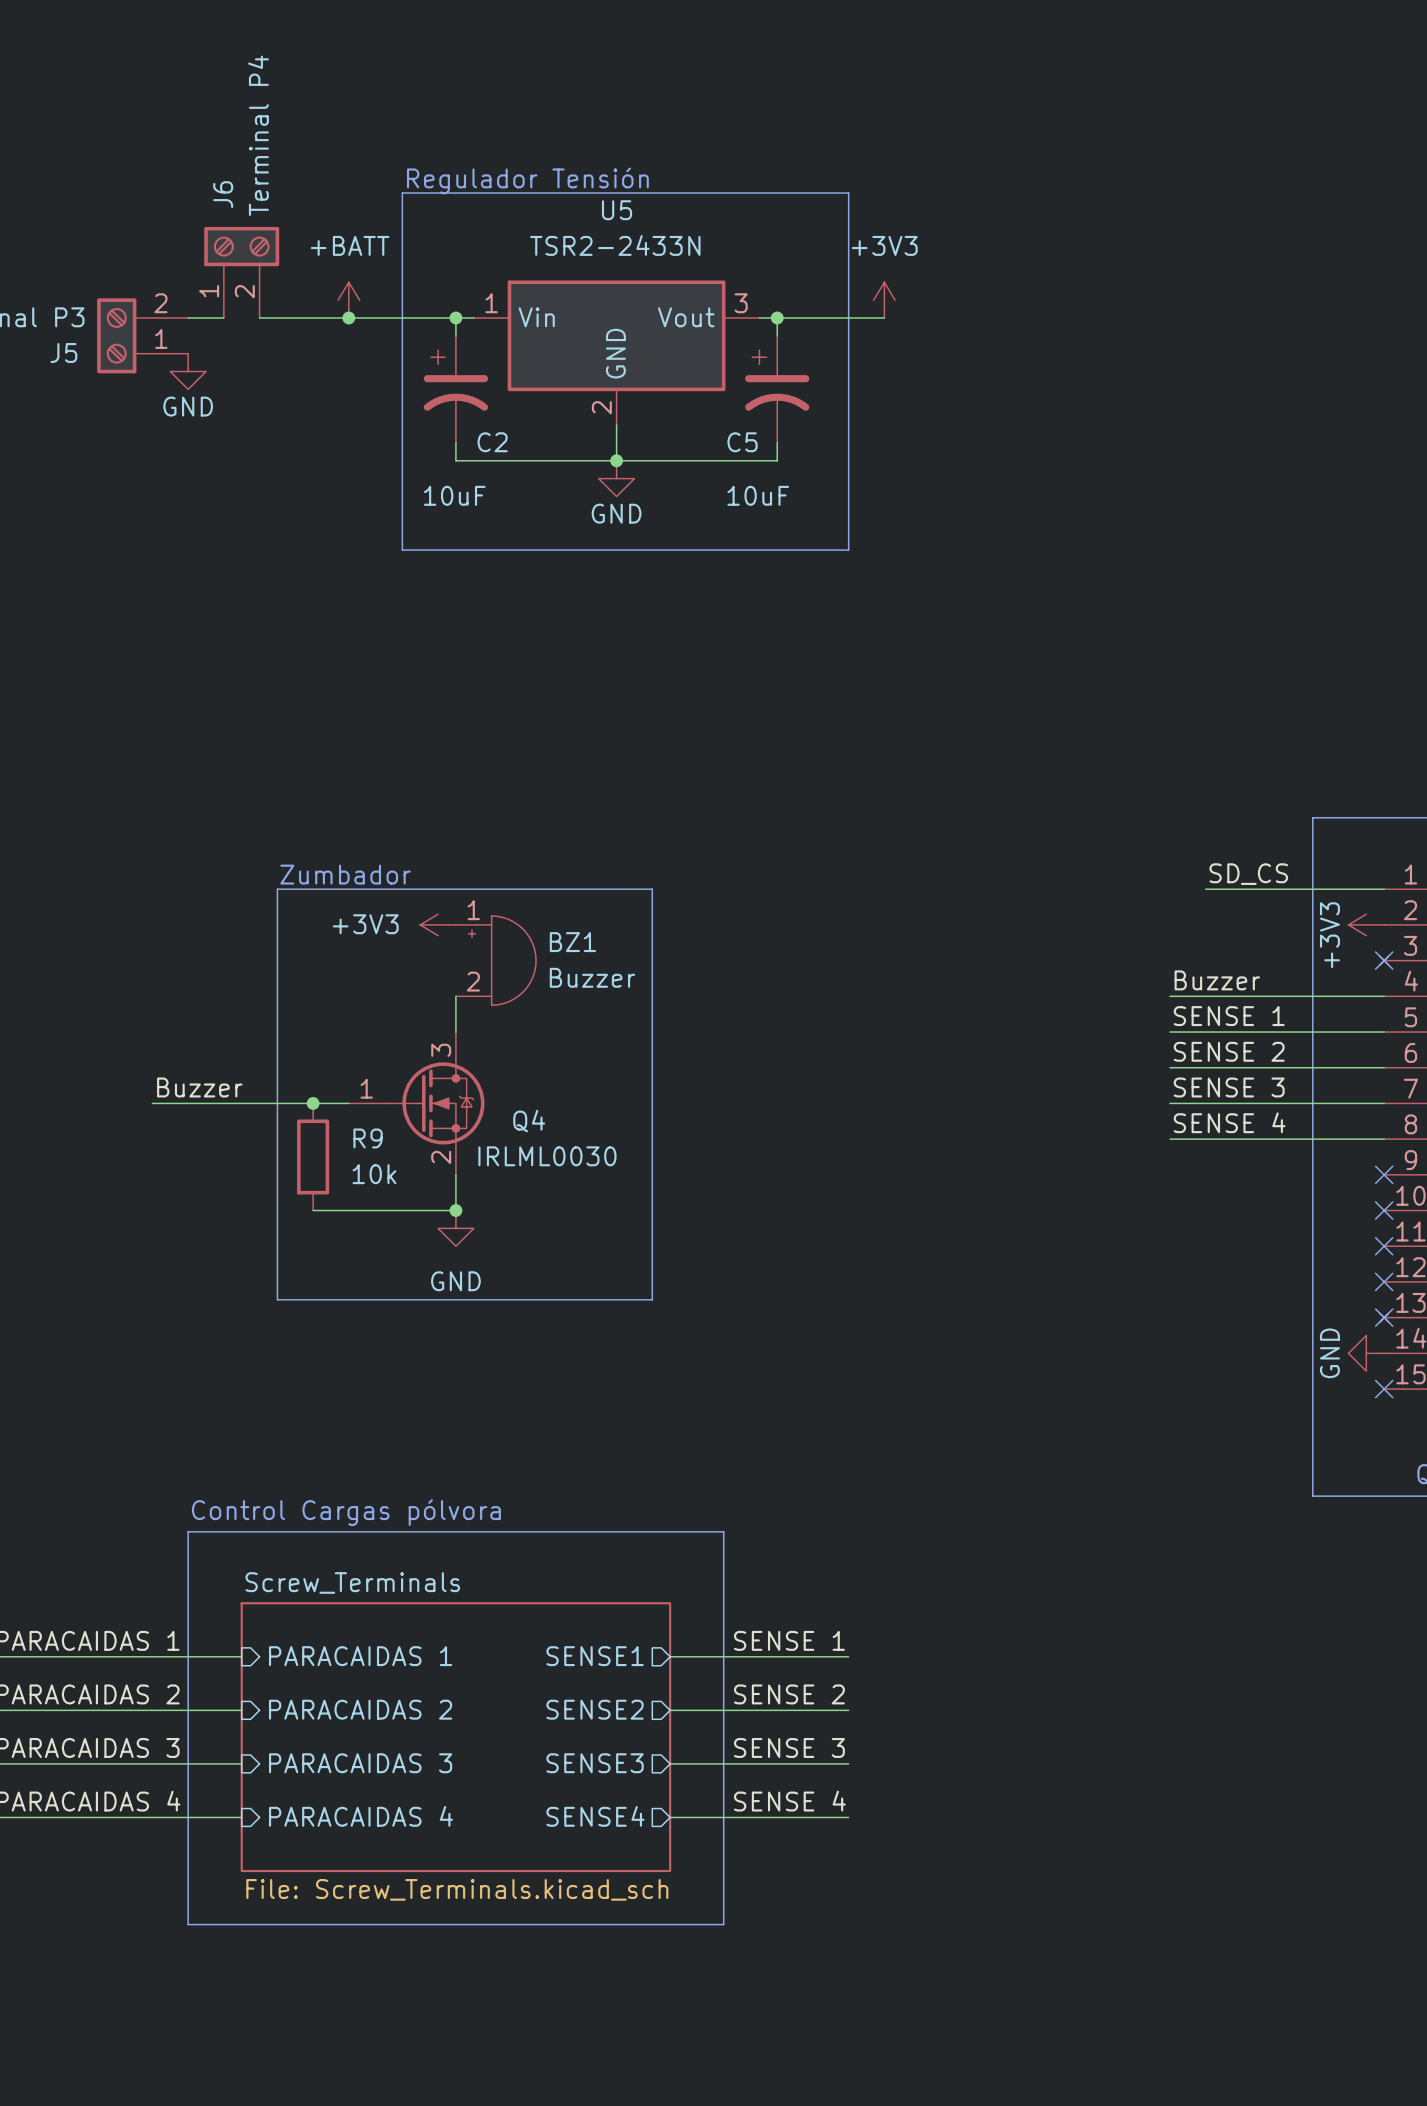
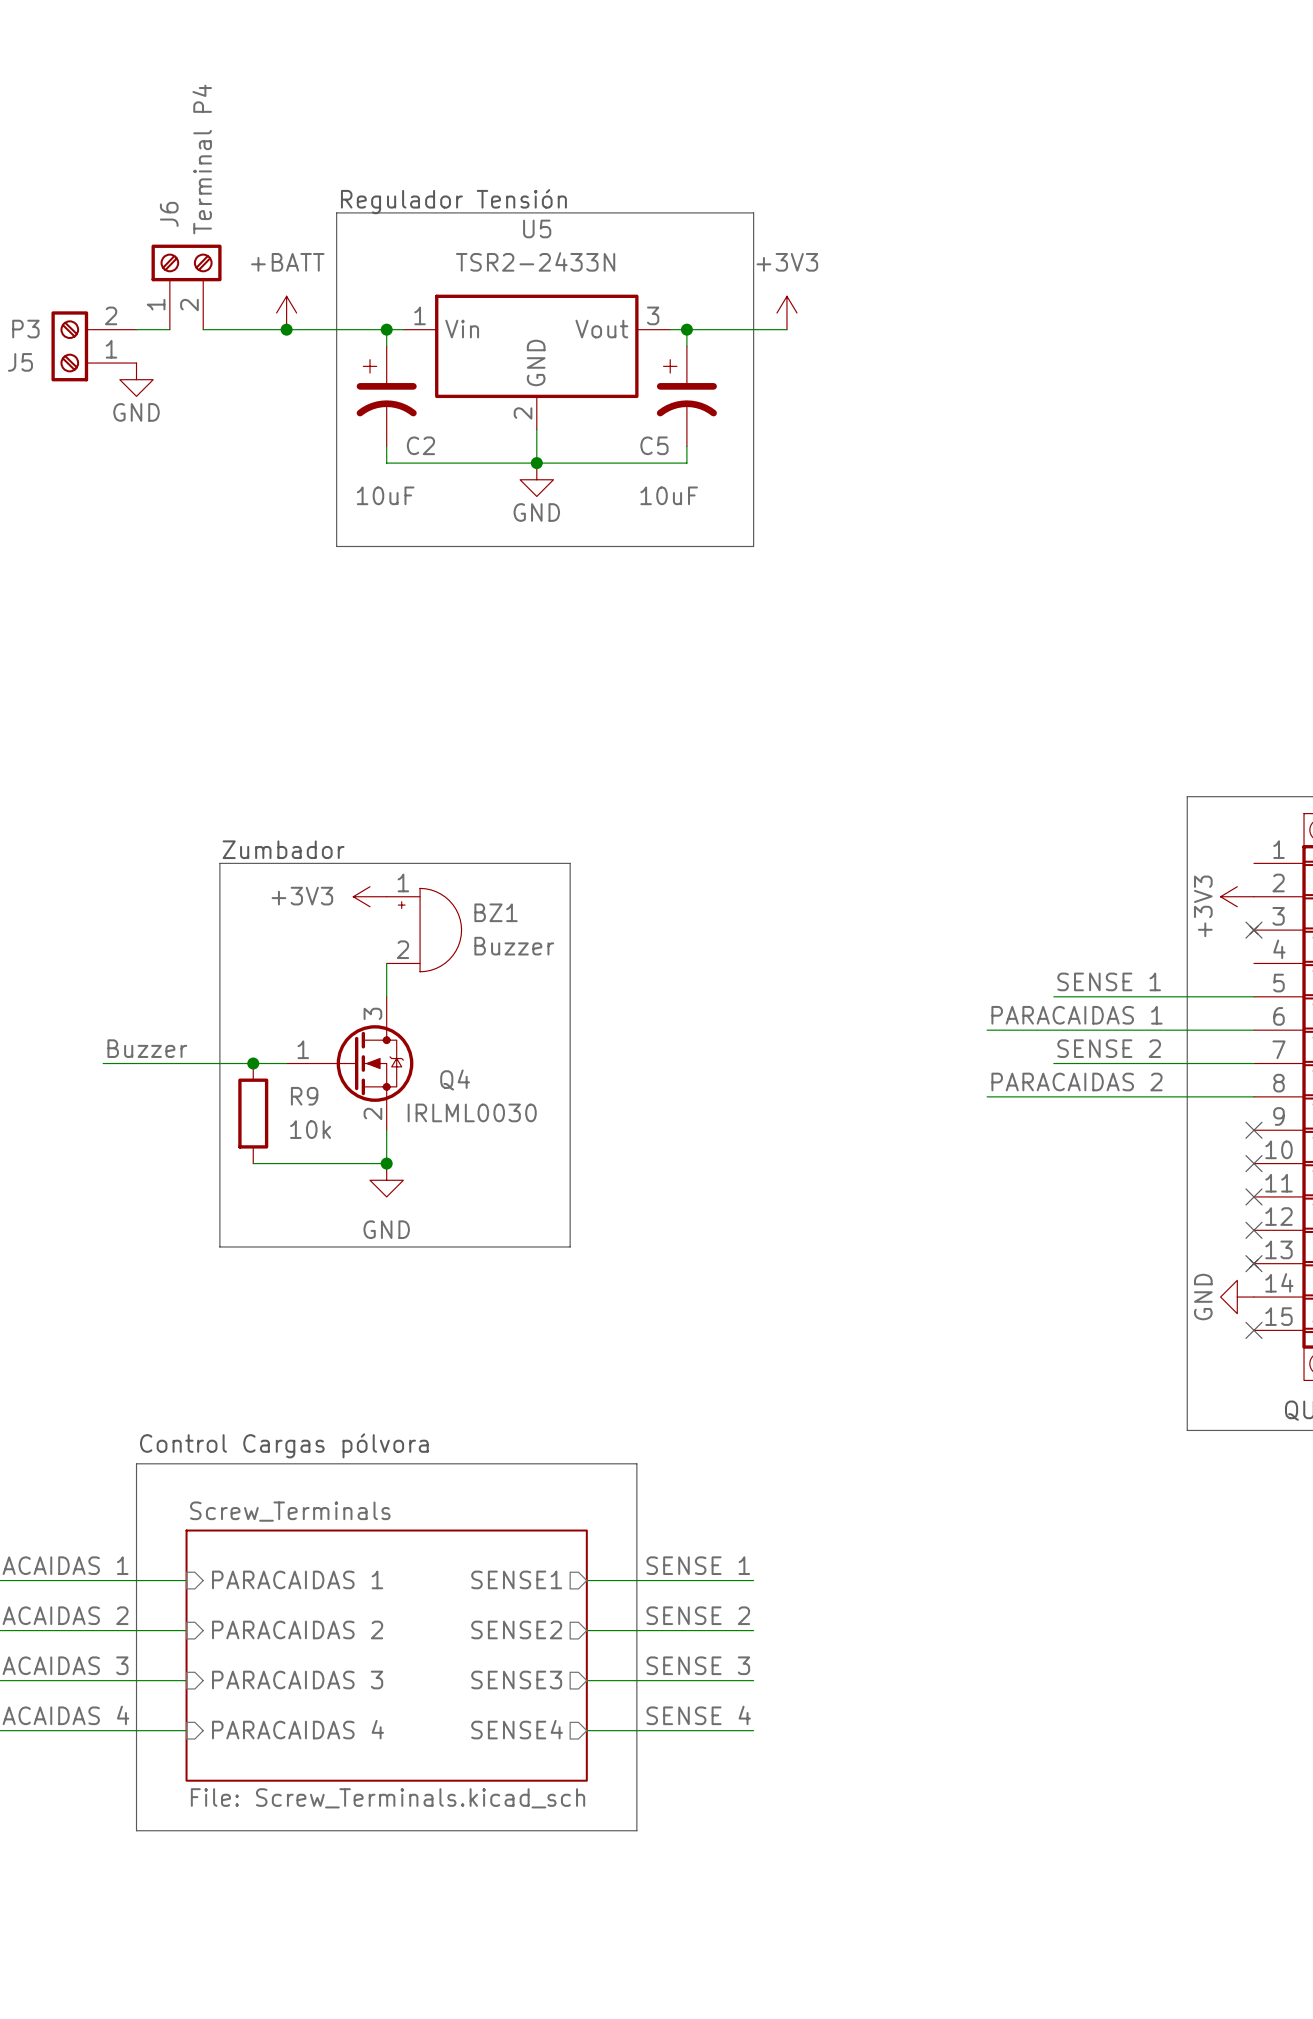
label: SD_CS (1248, 874) -> none
wire: (1205, 889) (1384, 889) -> none
label: Buzzer (1217, 980) -> none
wire: (1169, 996) (1384, 996) -> none
label: none -> PARACAIDAS 1 (1076, 1015)
label: SENSE 2 (1229, 1051) -> none
wire: none -> (987, 1030) (1053, 1030)
label: SENSE 3 (1229, 1087) -> SENSE 2 (1109, 1048)
label: SENSE 4 (1229, 1122) -> none
label: none -> PARACAIDAS 2 (1076, 1082)
wire: none -> (987, 1096) (1053, 1096)

